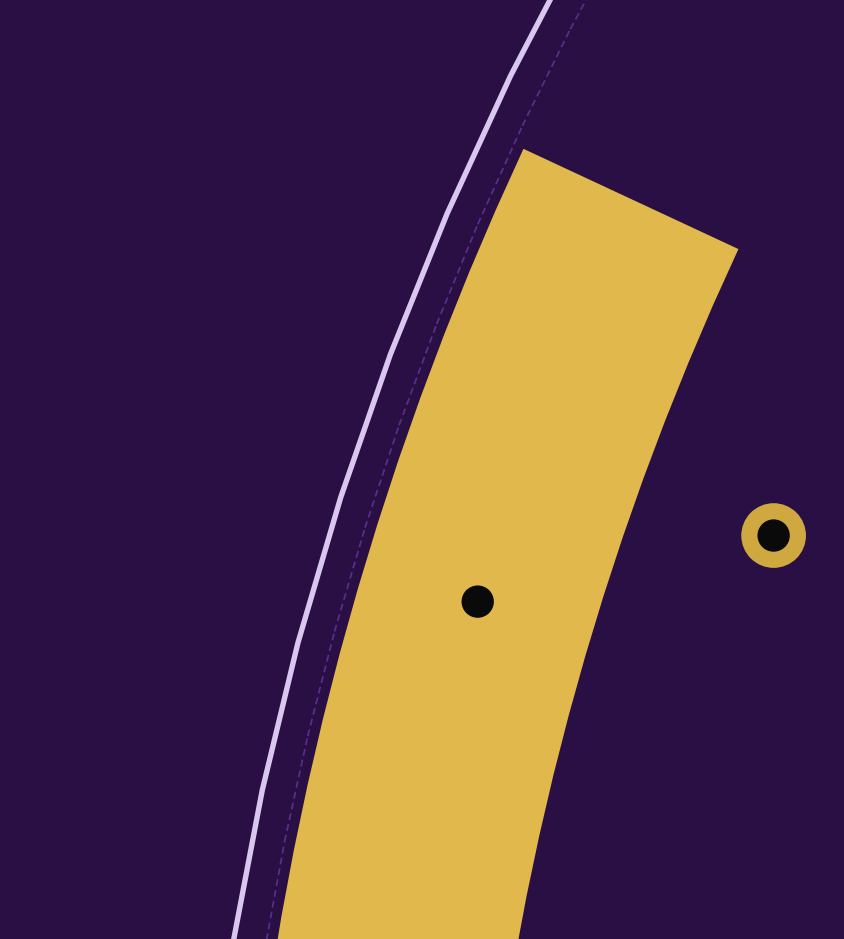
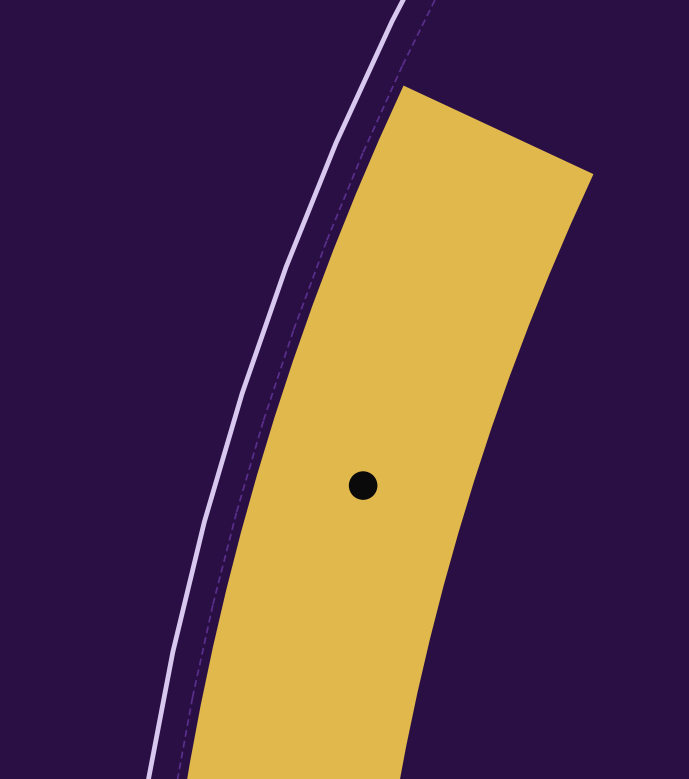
via: (773, 535) -> none

